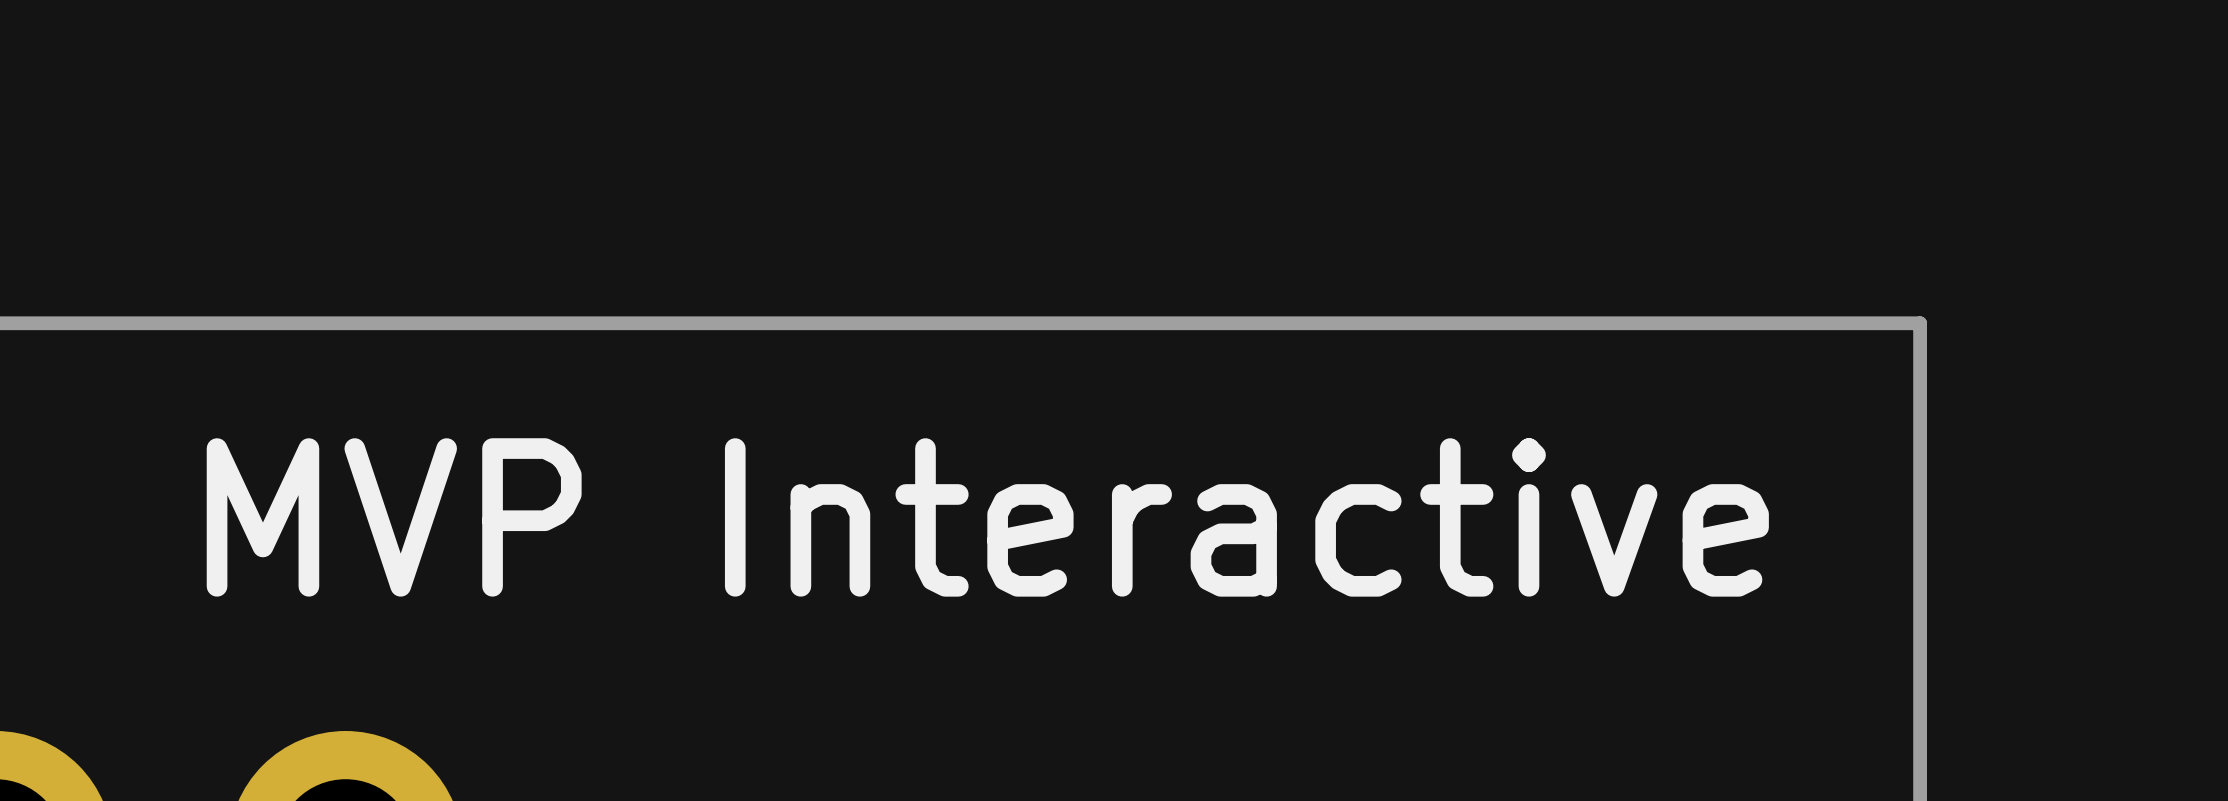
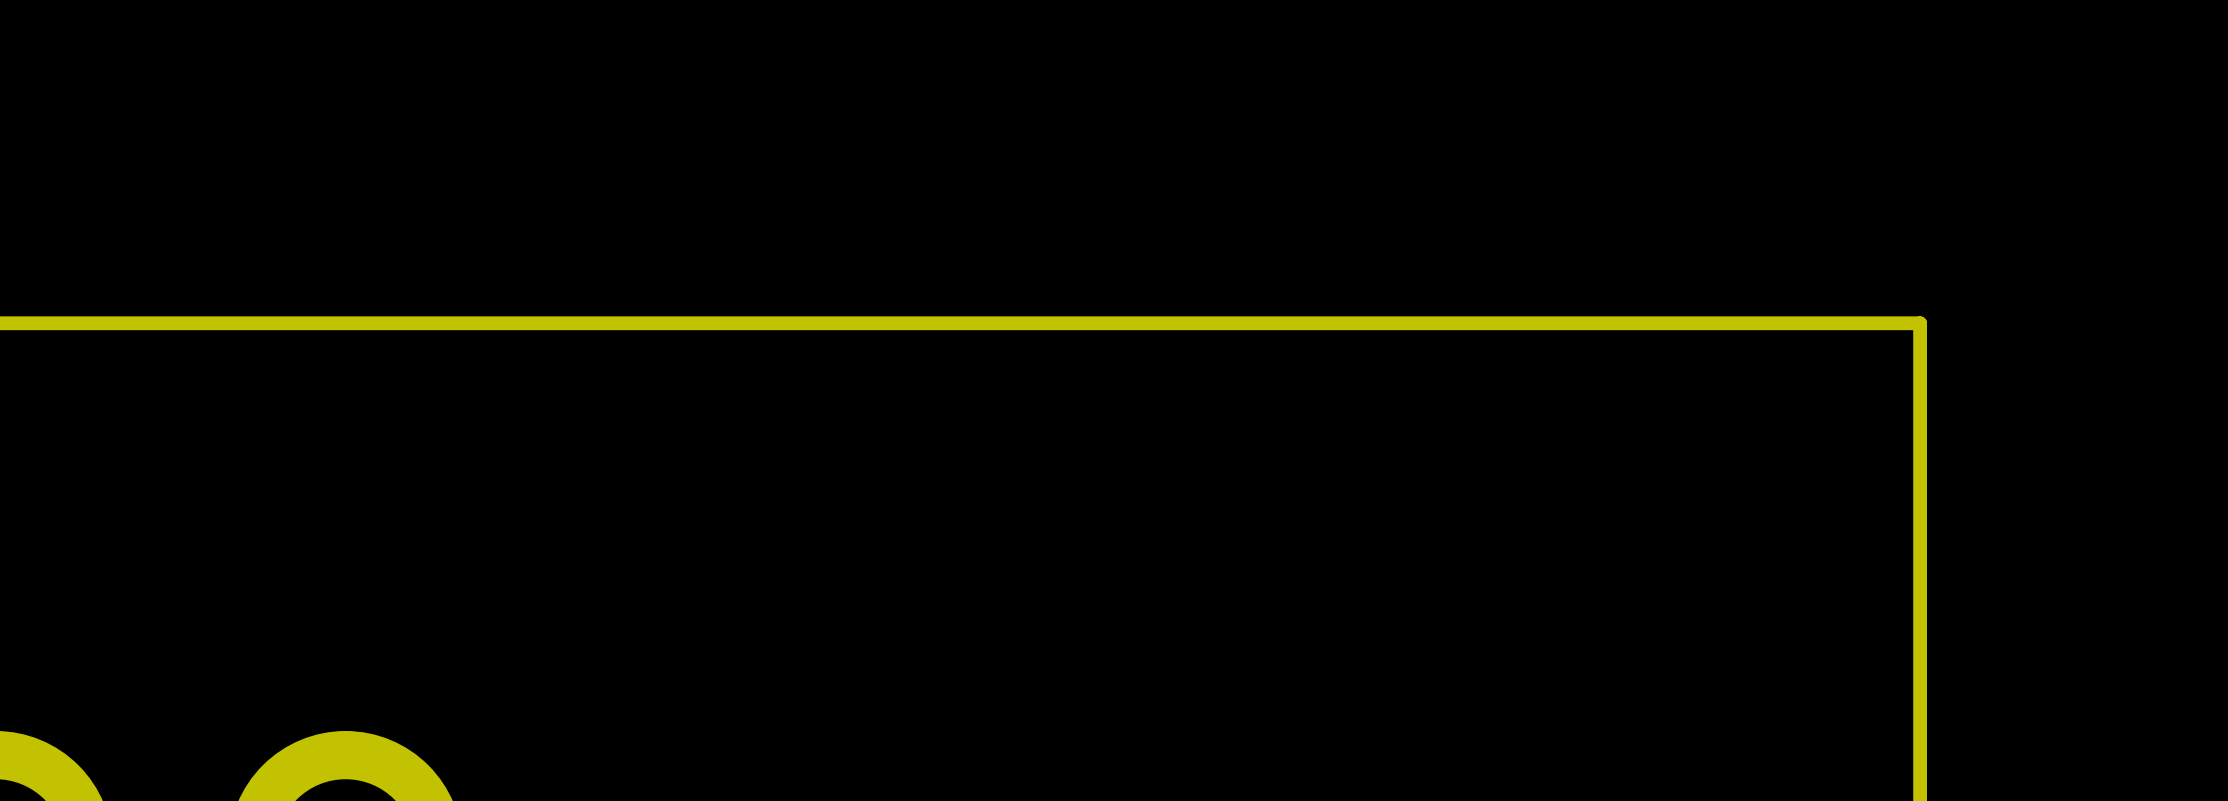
text: MVP Interactive (987, 517) -> none

